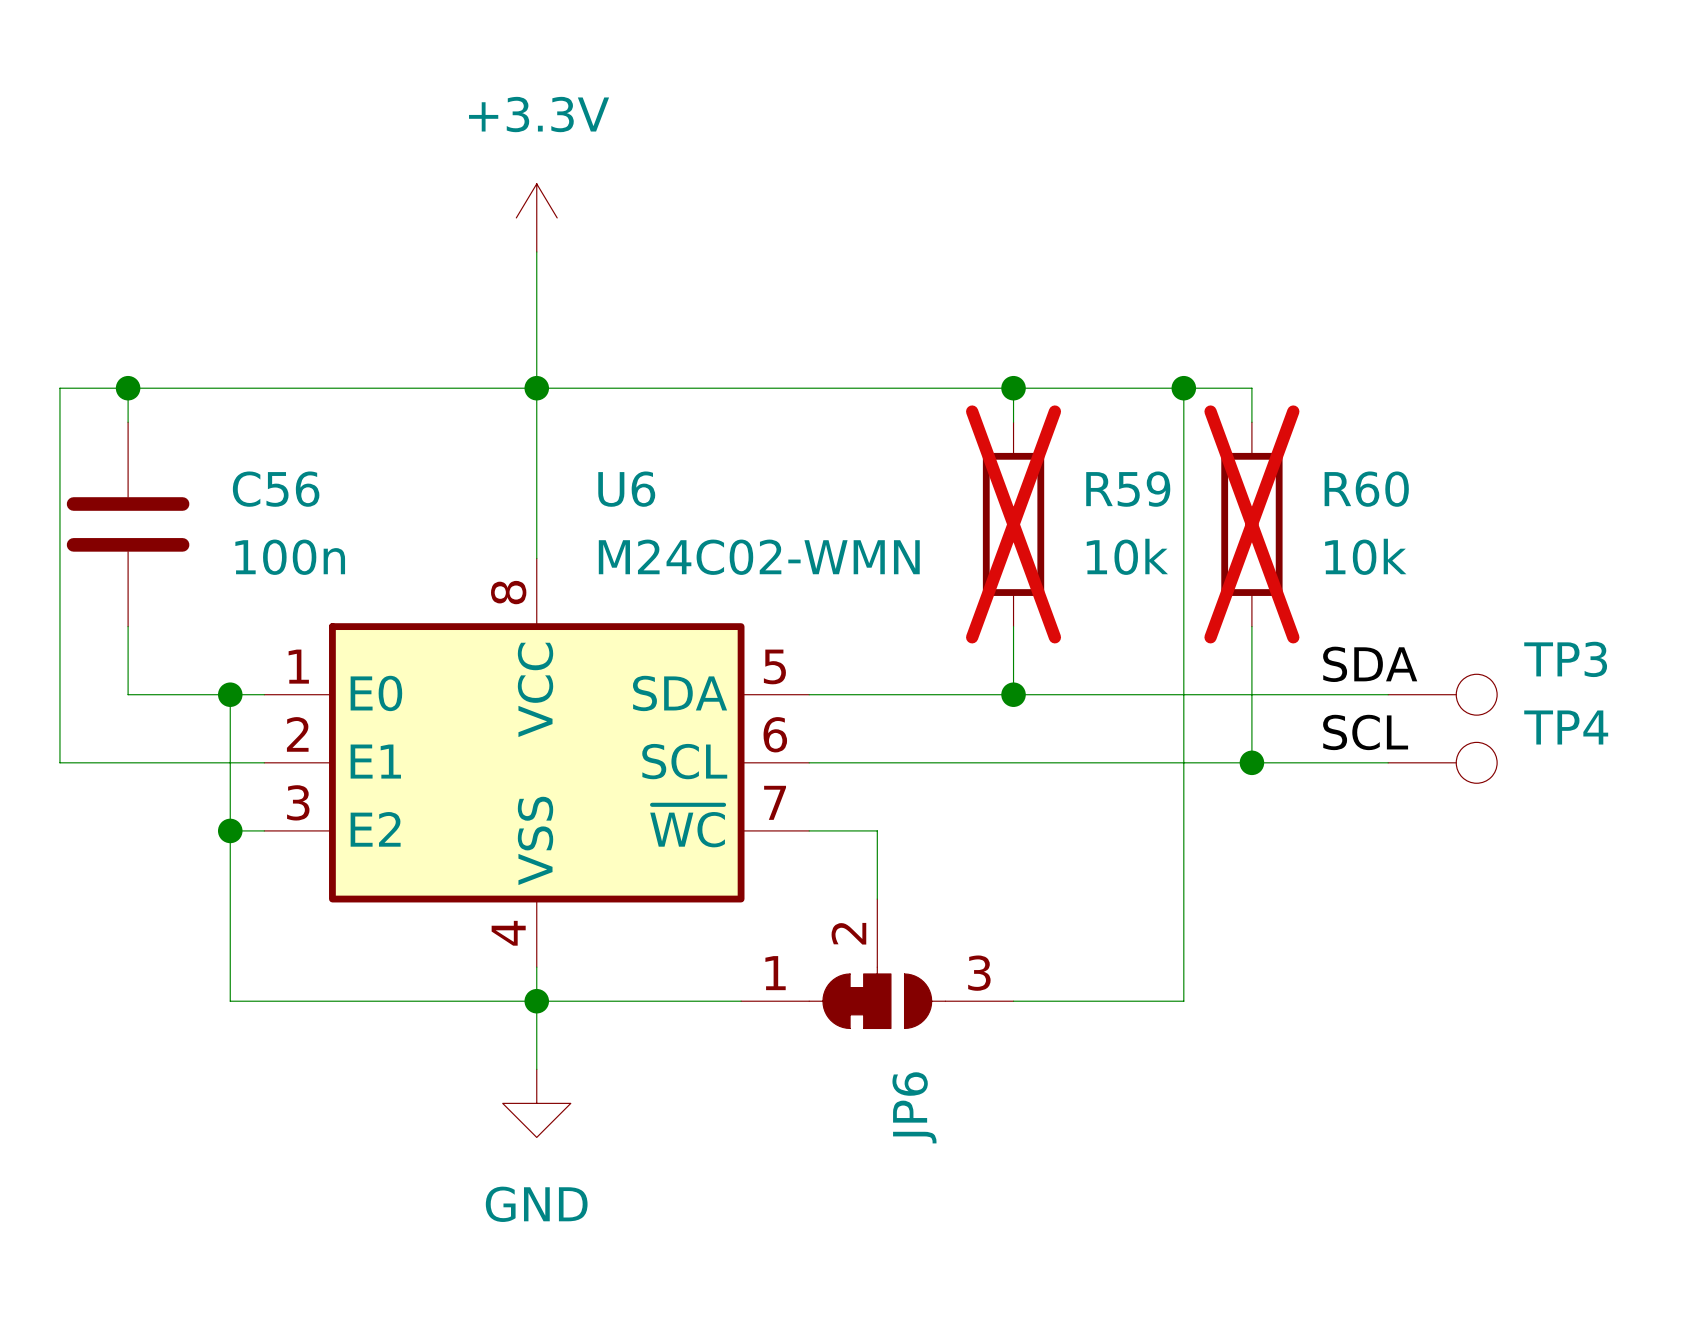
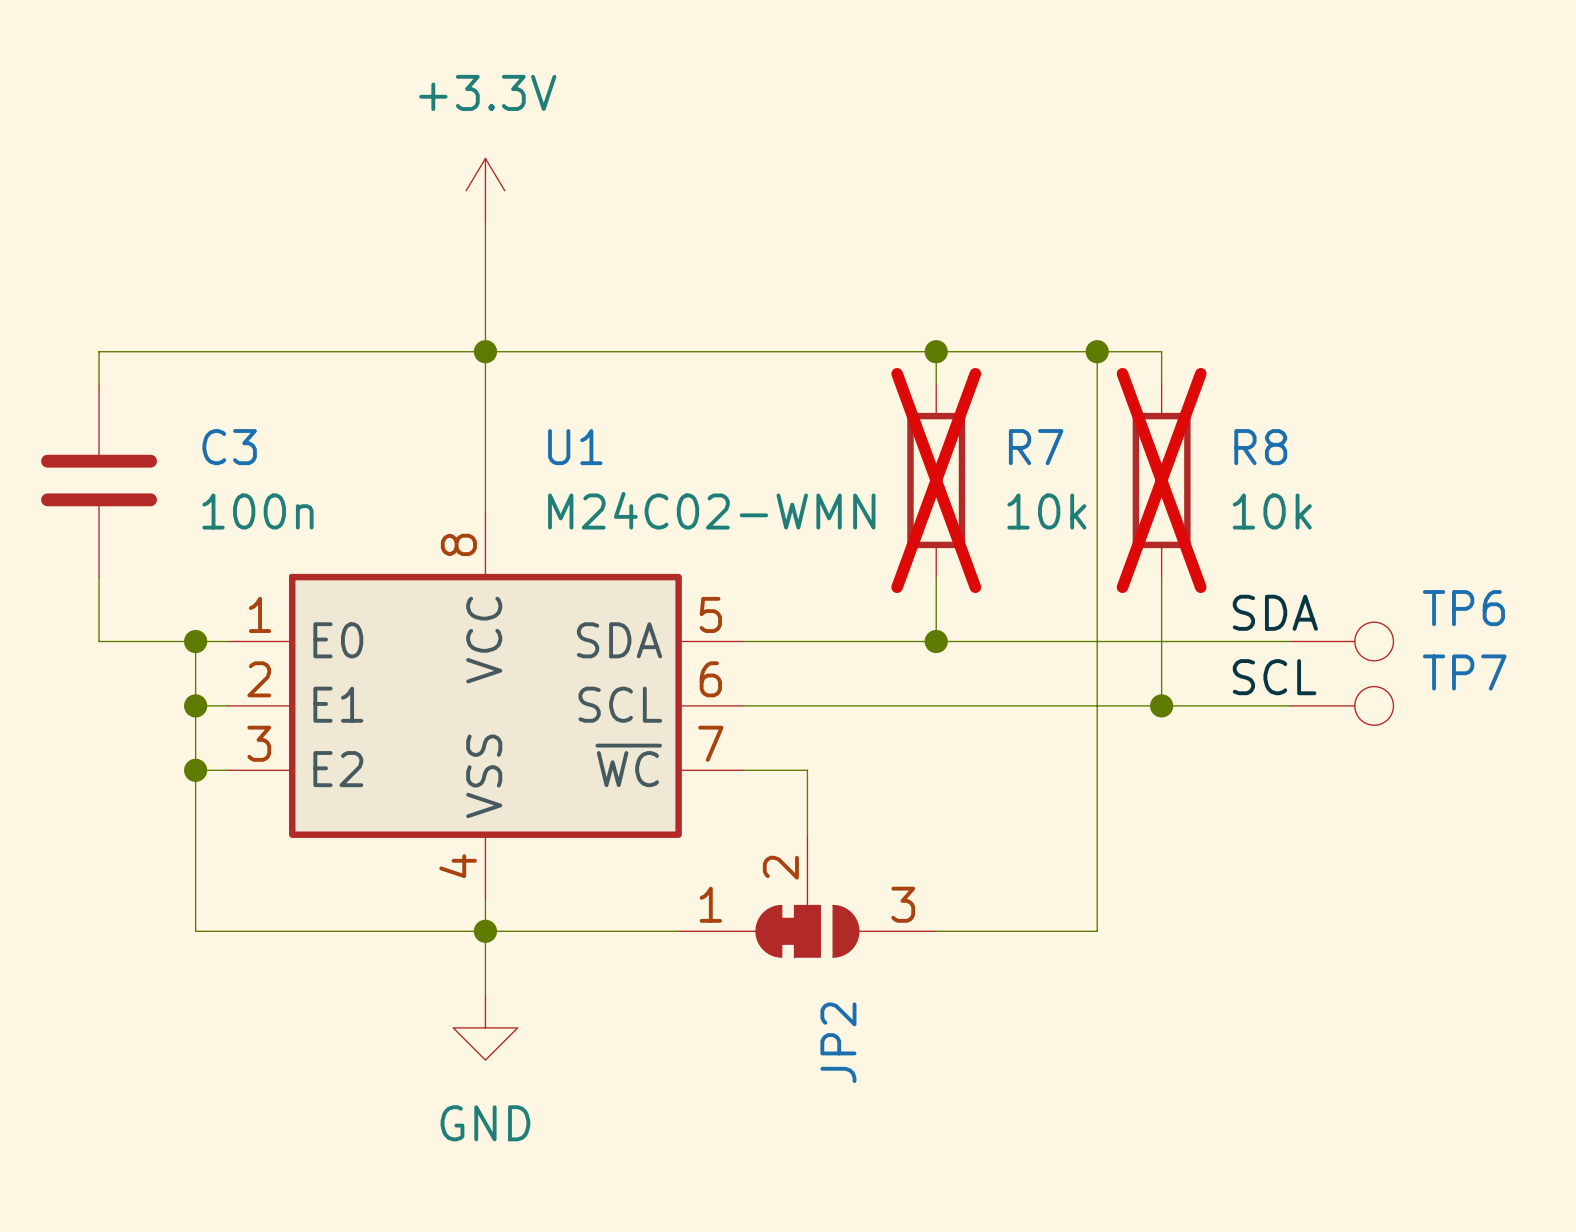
wire: (128, 388) (59, 388) (59, 762) (230, 762) -> none
junction: (128, 388) -> none
C56 name: C56 (276, 489) -> C3 (229, 447)
U6 name: U6 (626, 489) -> U1 (575, 447)
R59 name: R59 (1128, 489) -> R7 (1036, 447)
R60 name: R60 (1366, 489) -> R8 (1260, 447)
TP3 name: TP3 (1565, 659) -> TP6 (1463, 608)
TP4 name: TP4 (1566, 727) -> TP7 (1464, 672)
junction: none -> (195, 705)
JP6 name: JP6 (914, 1107) -> JP2 (838, 1042)

